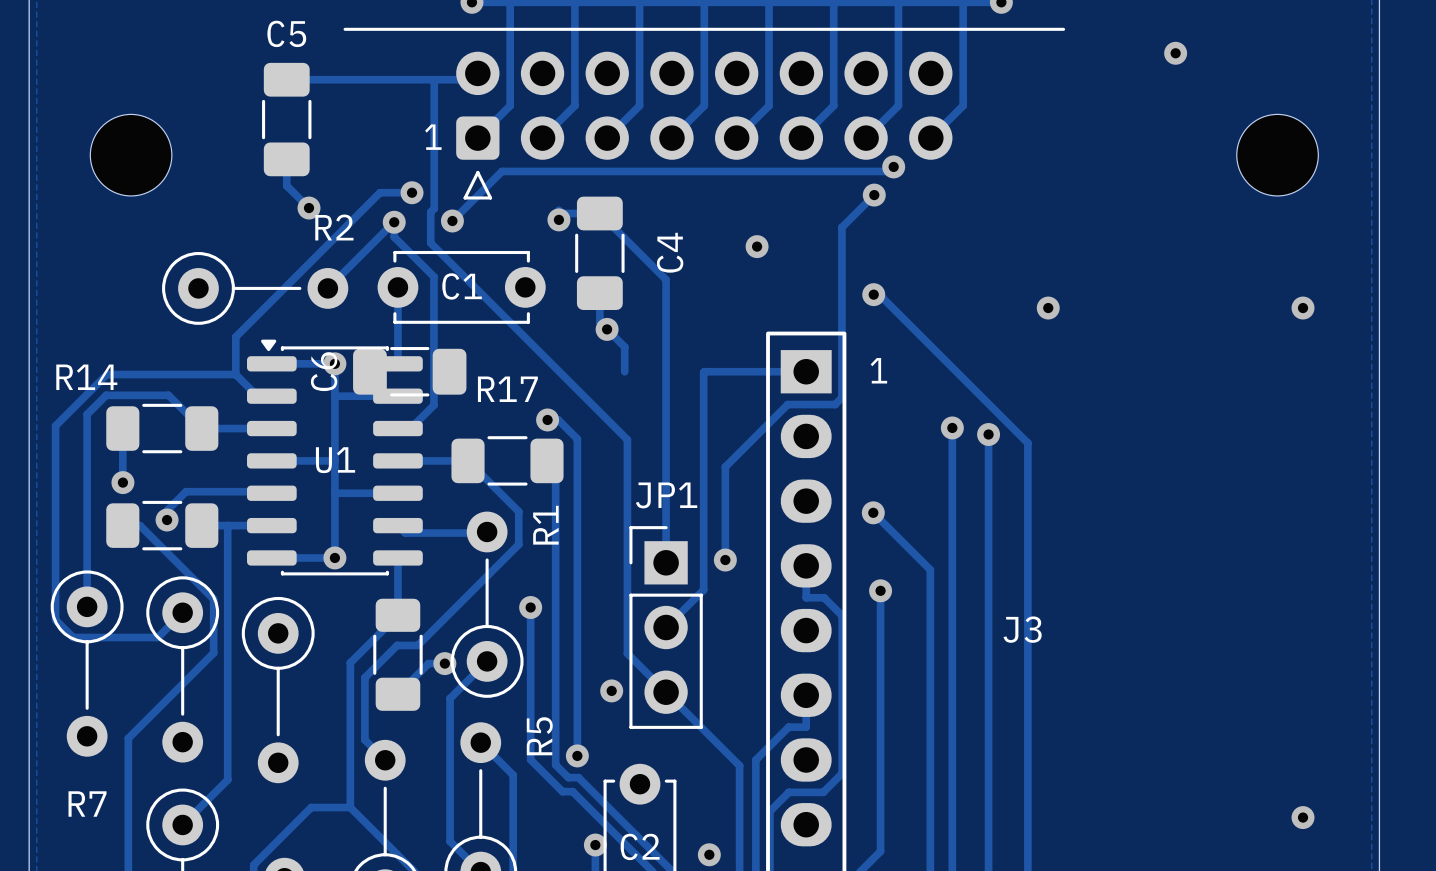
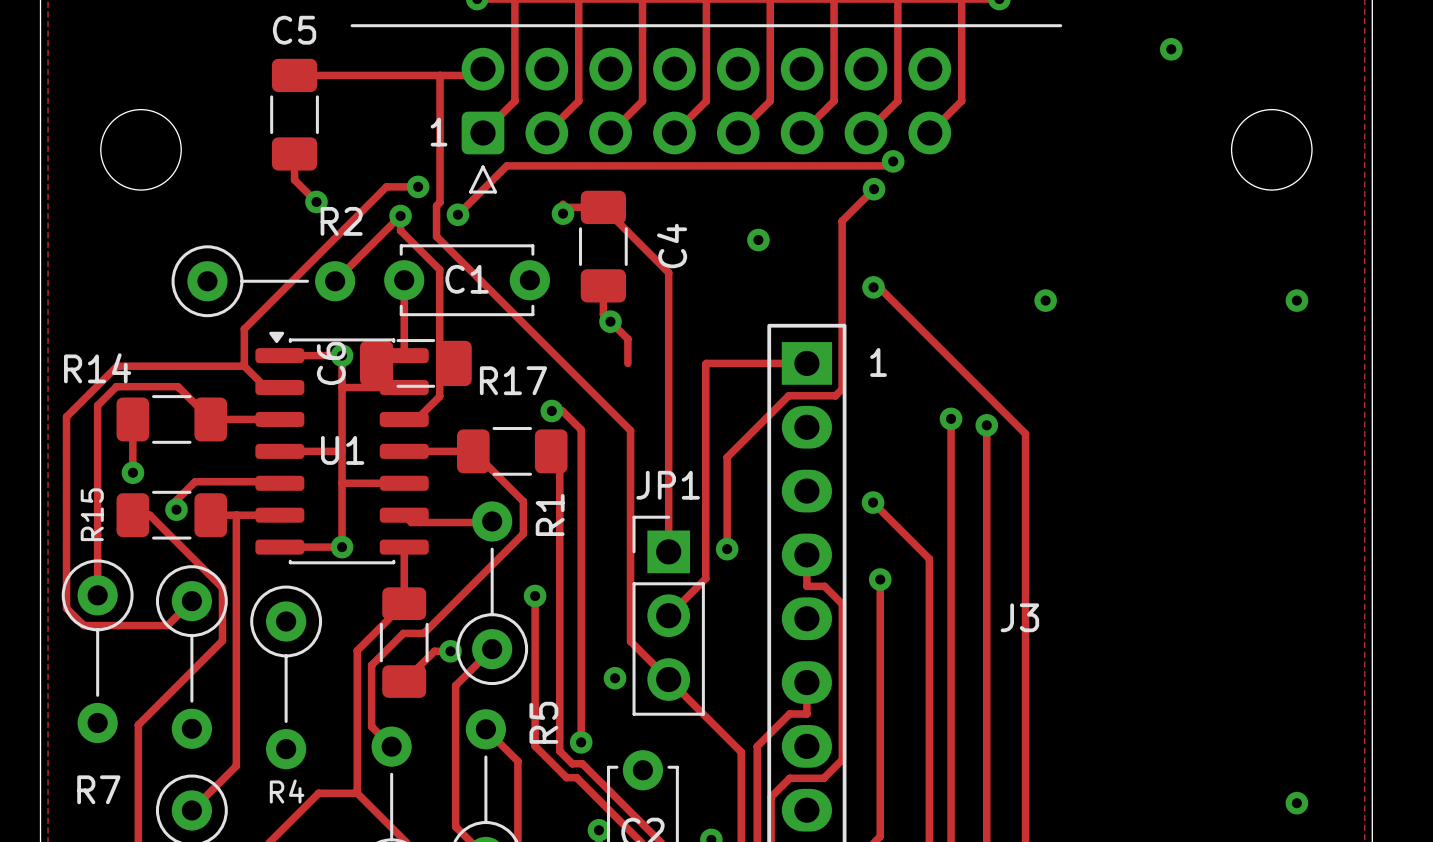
R15 name: none -> R15 (92, 514)
R4 name: none -> R4 (287, 791)

